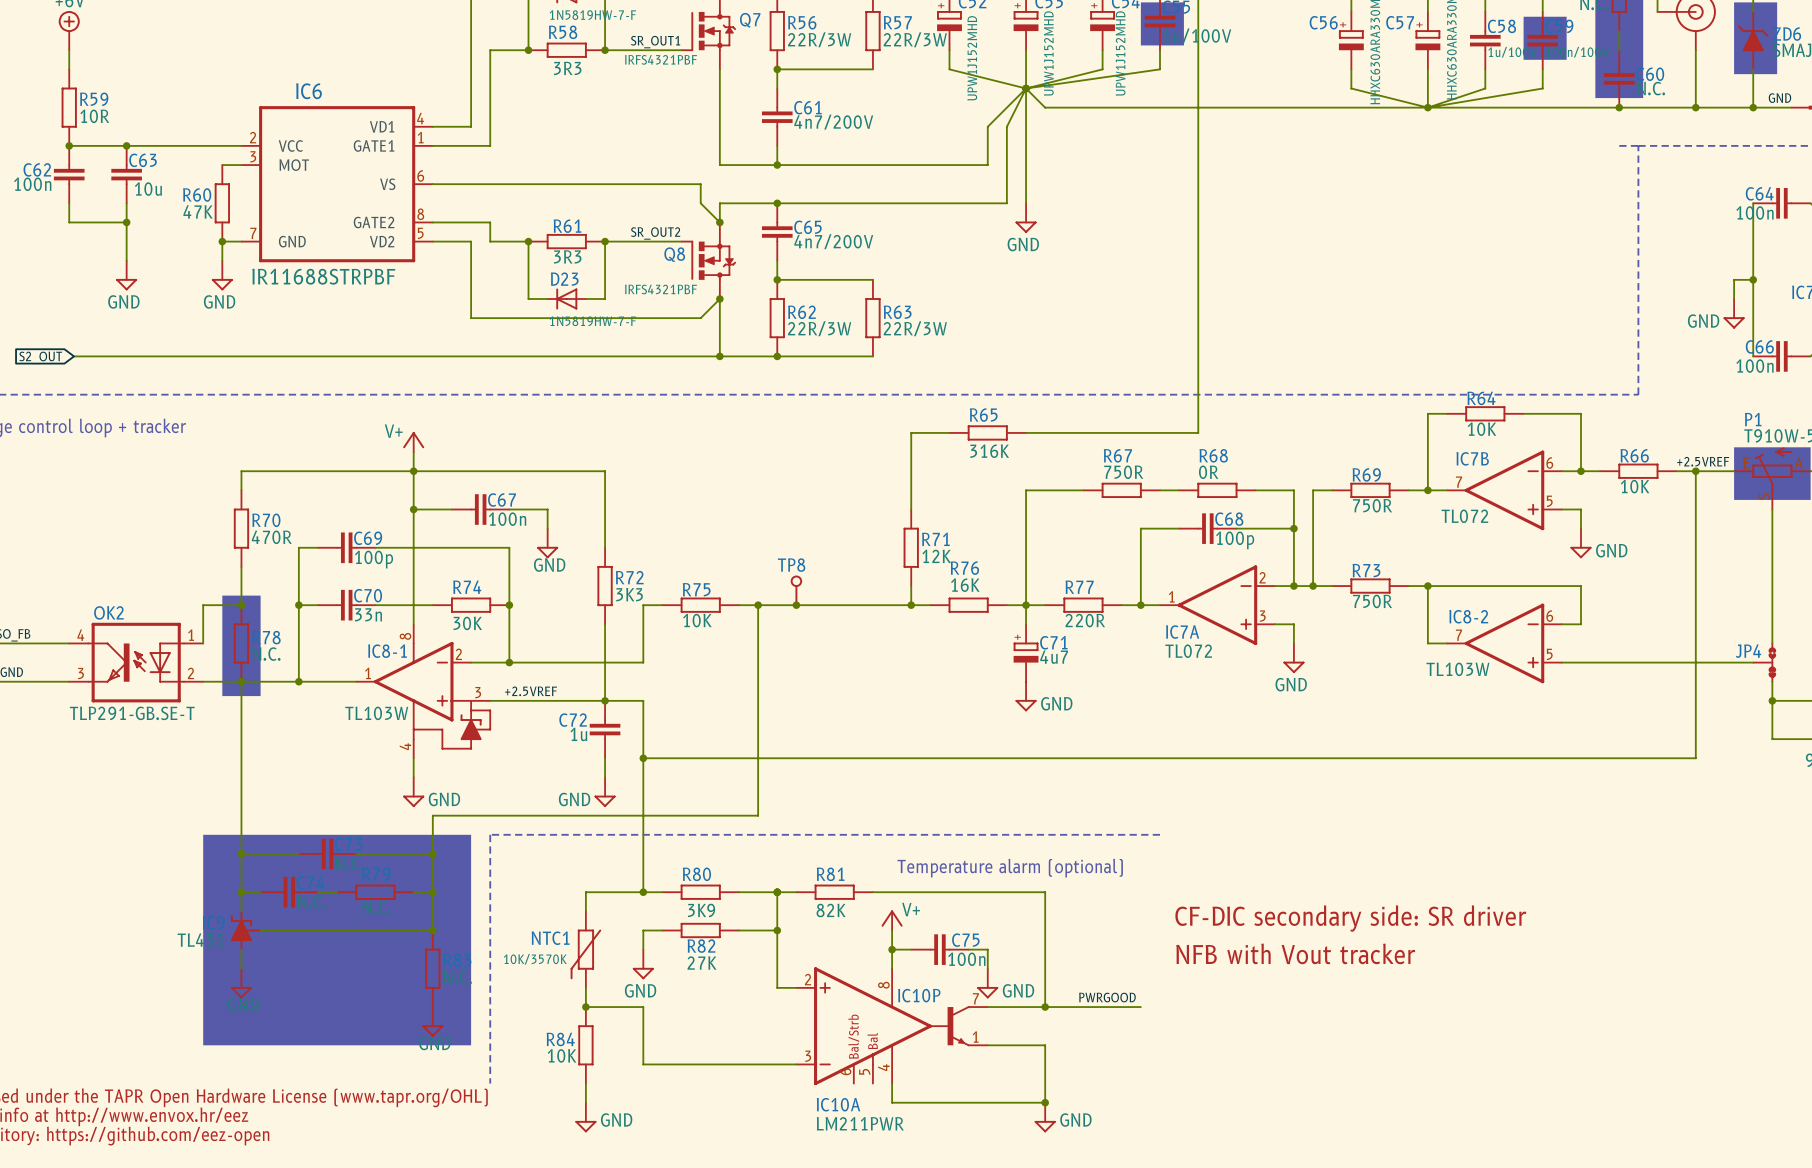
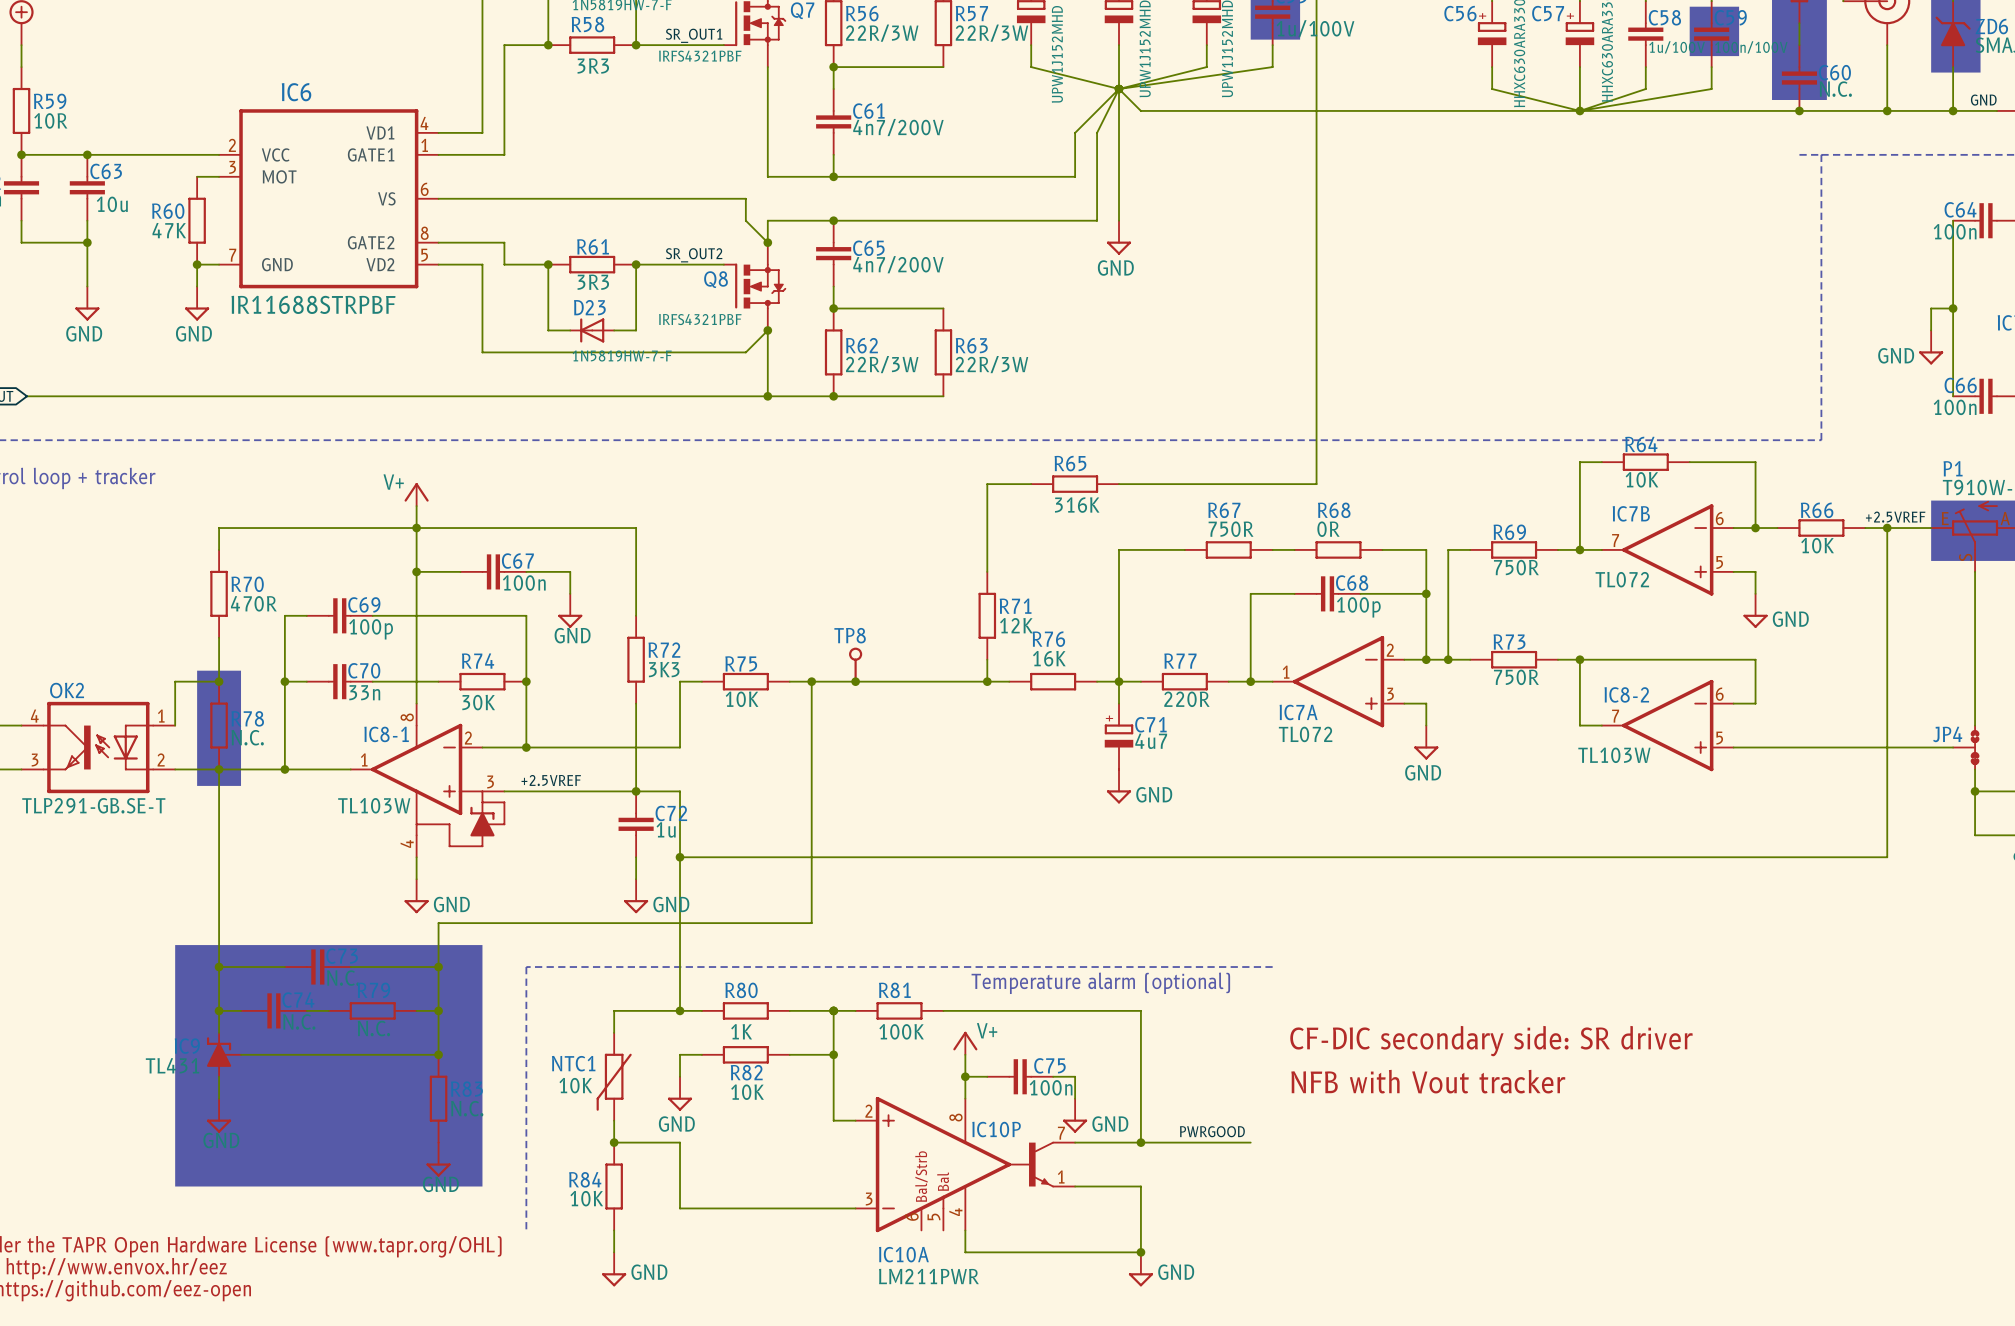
C72 name position: C72 (573, 720) -> C72 (671, 813)
C72 value position: 1u (578, 734) -> 1u (666, 829)
power symbol text position: GND (574, 799) -> GND (671, 904)
line: (1160, 834) (490, 834) (490, 1083) -> none
line: none -> (1272, 967) (526, 967) (526, 1230)
R80 value: 3K9 (701, 910) -> 1K (741, 1031)
R81 value: 82K (831, 910) -> 100K (901, 1031)
NTC1 value: 10K/3570K (535, 959) -> 10K (575, 1085)
R82 value: 27K (702, 963) -> 10K (747, 1092)

